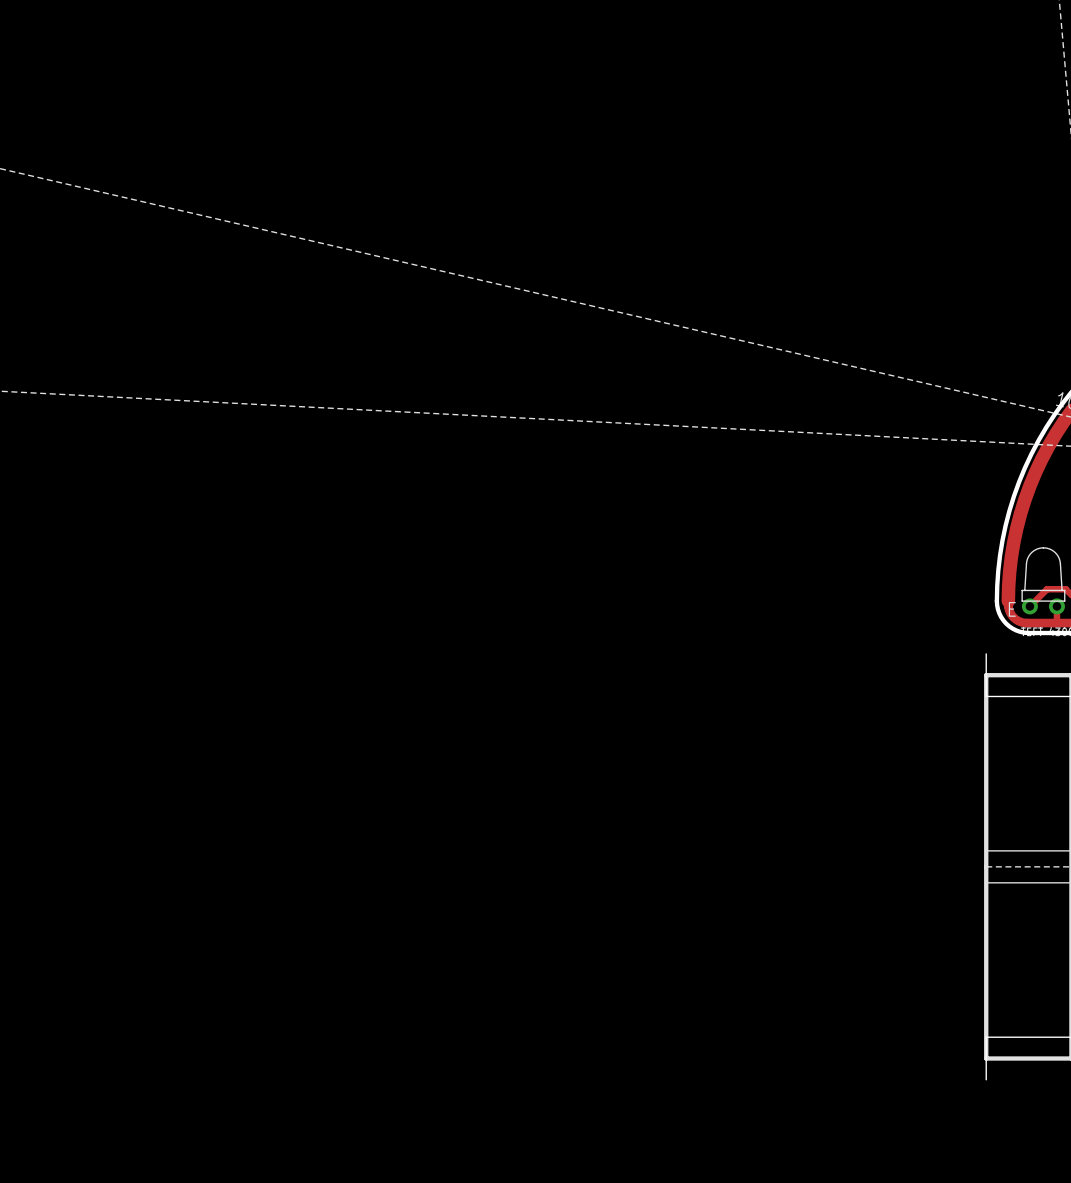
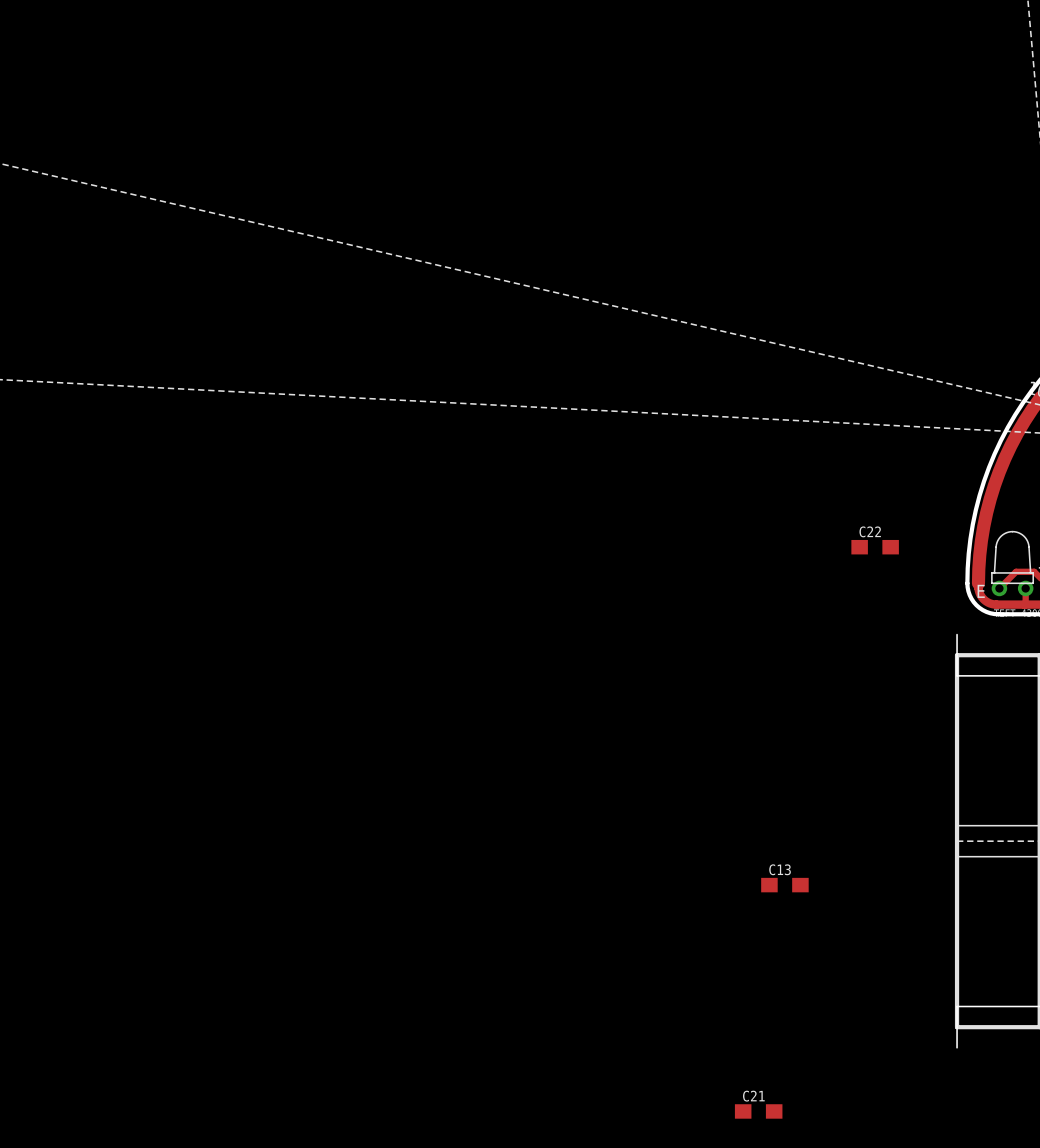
C22: none -> (875, 547)
C13: none -> (784, 885)
C21: none -> (758, 1111)

